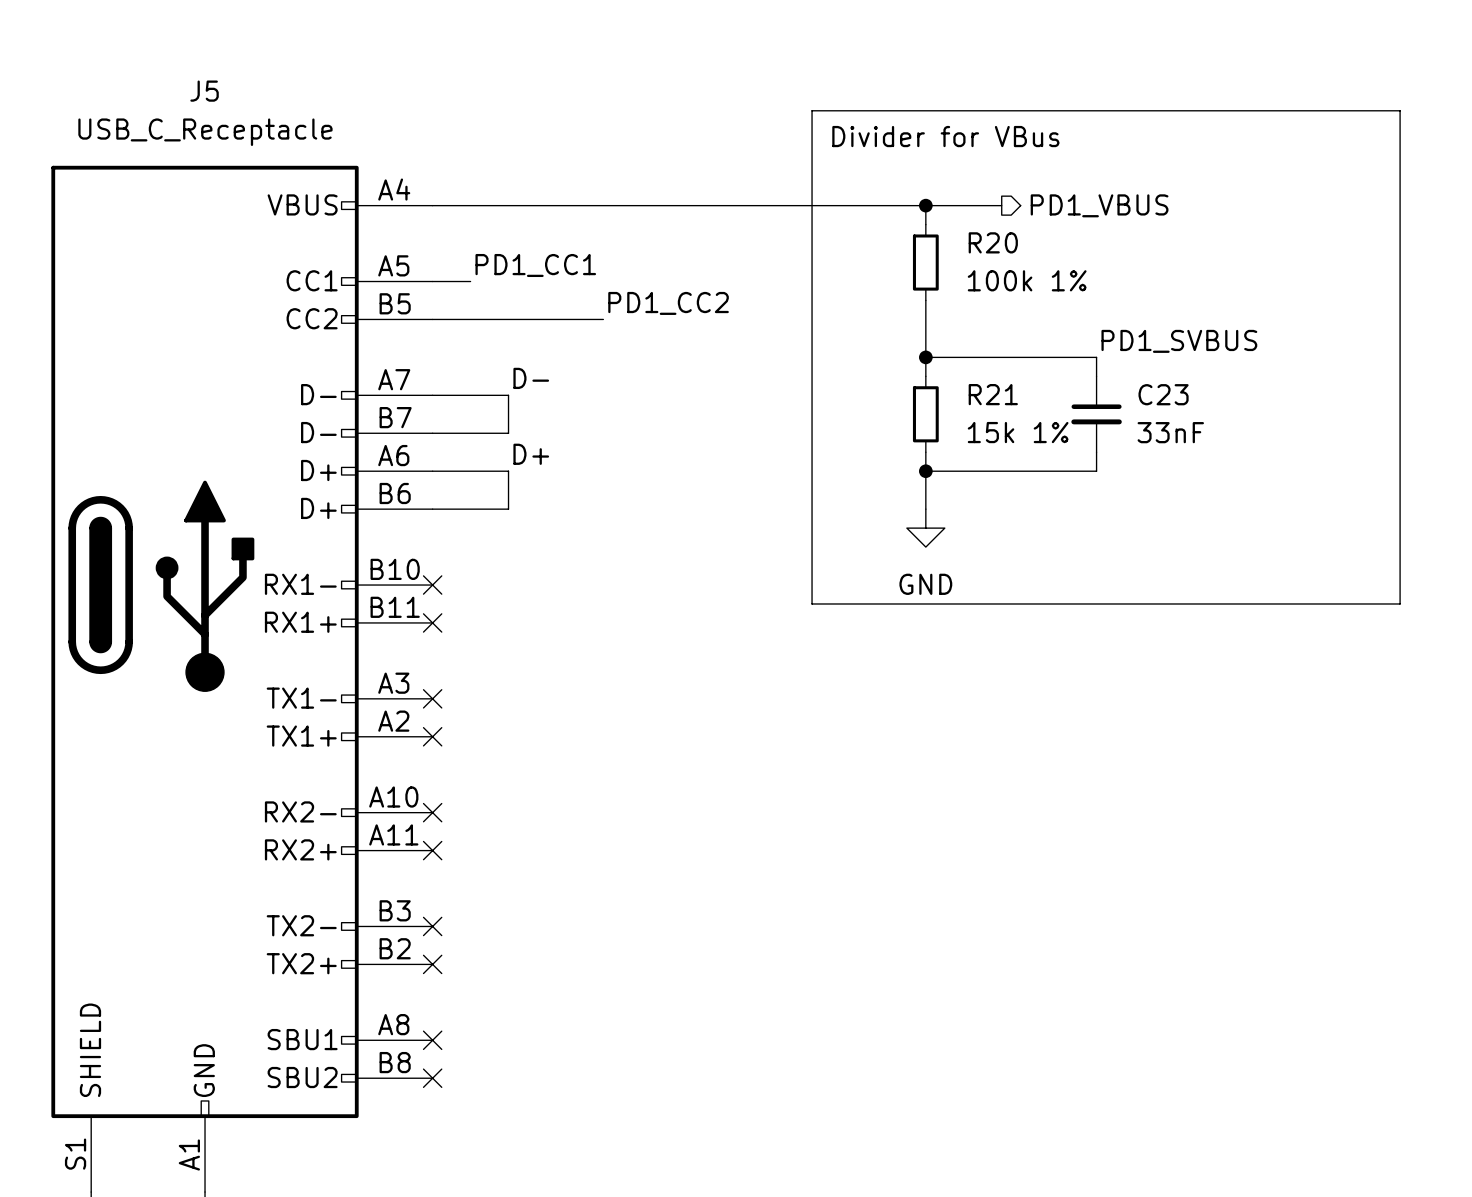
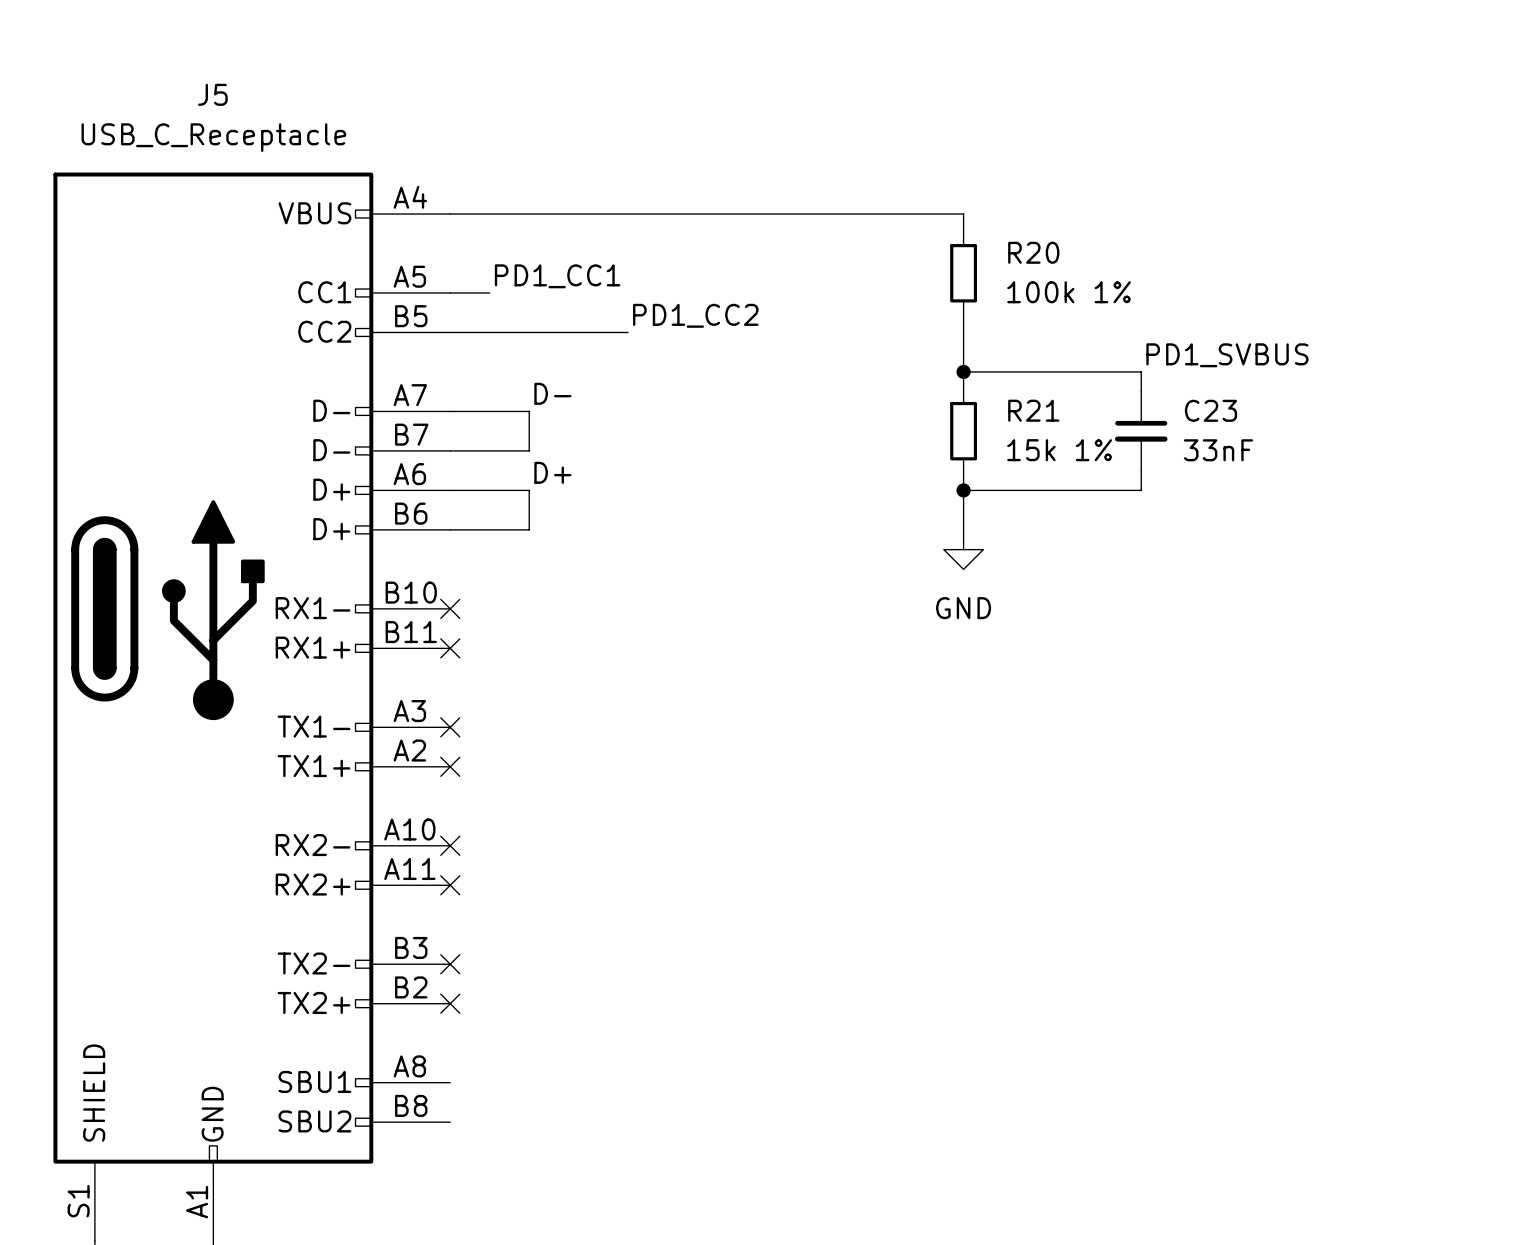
line: (812, 110) (1400, 110) (1400, 603) (812, 603) (812, 110) -> none
text: Divider for VBus (945, 136) -> none
wire: (925, 205) (1001, 205) -> none
junction: (925, 205) -> none
hierarchical label: PD1_VBUS (1099, 205) -> none
no-connect mark: (432, 1040) -> none
no-connect mark: (432, 1078) -> none

